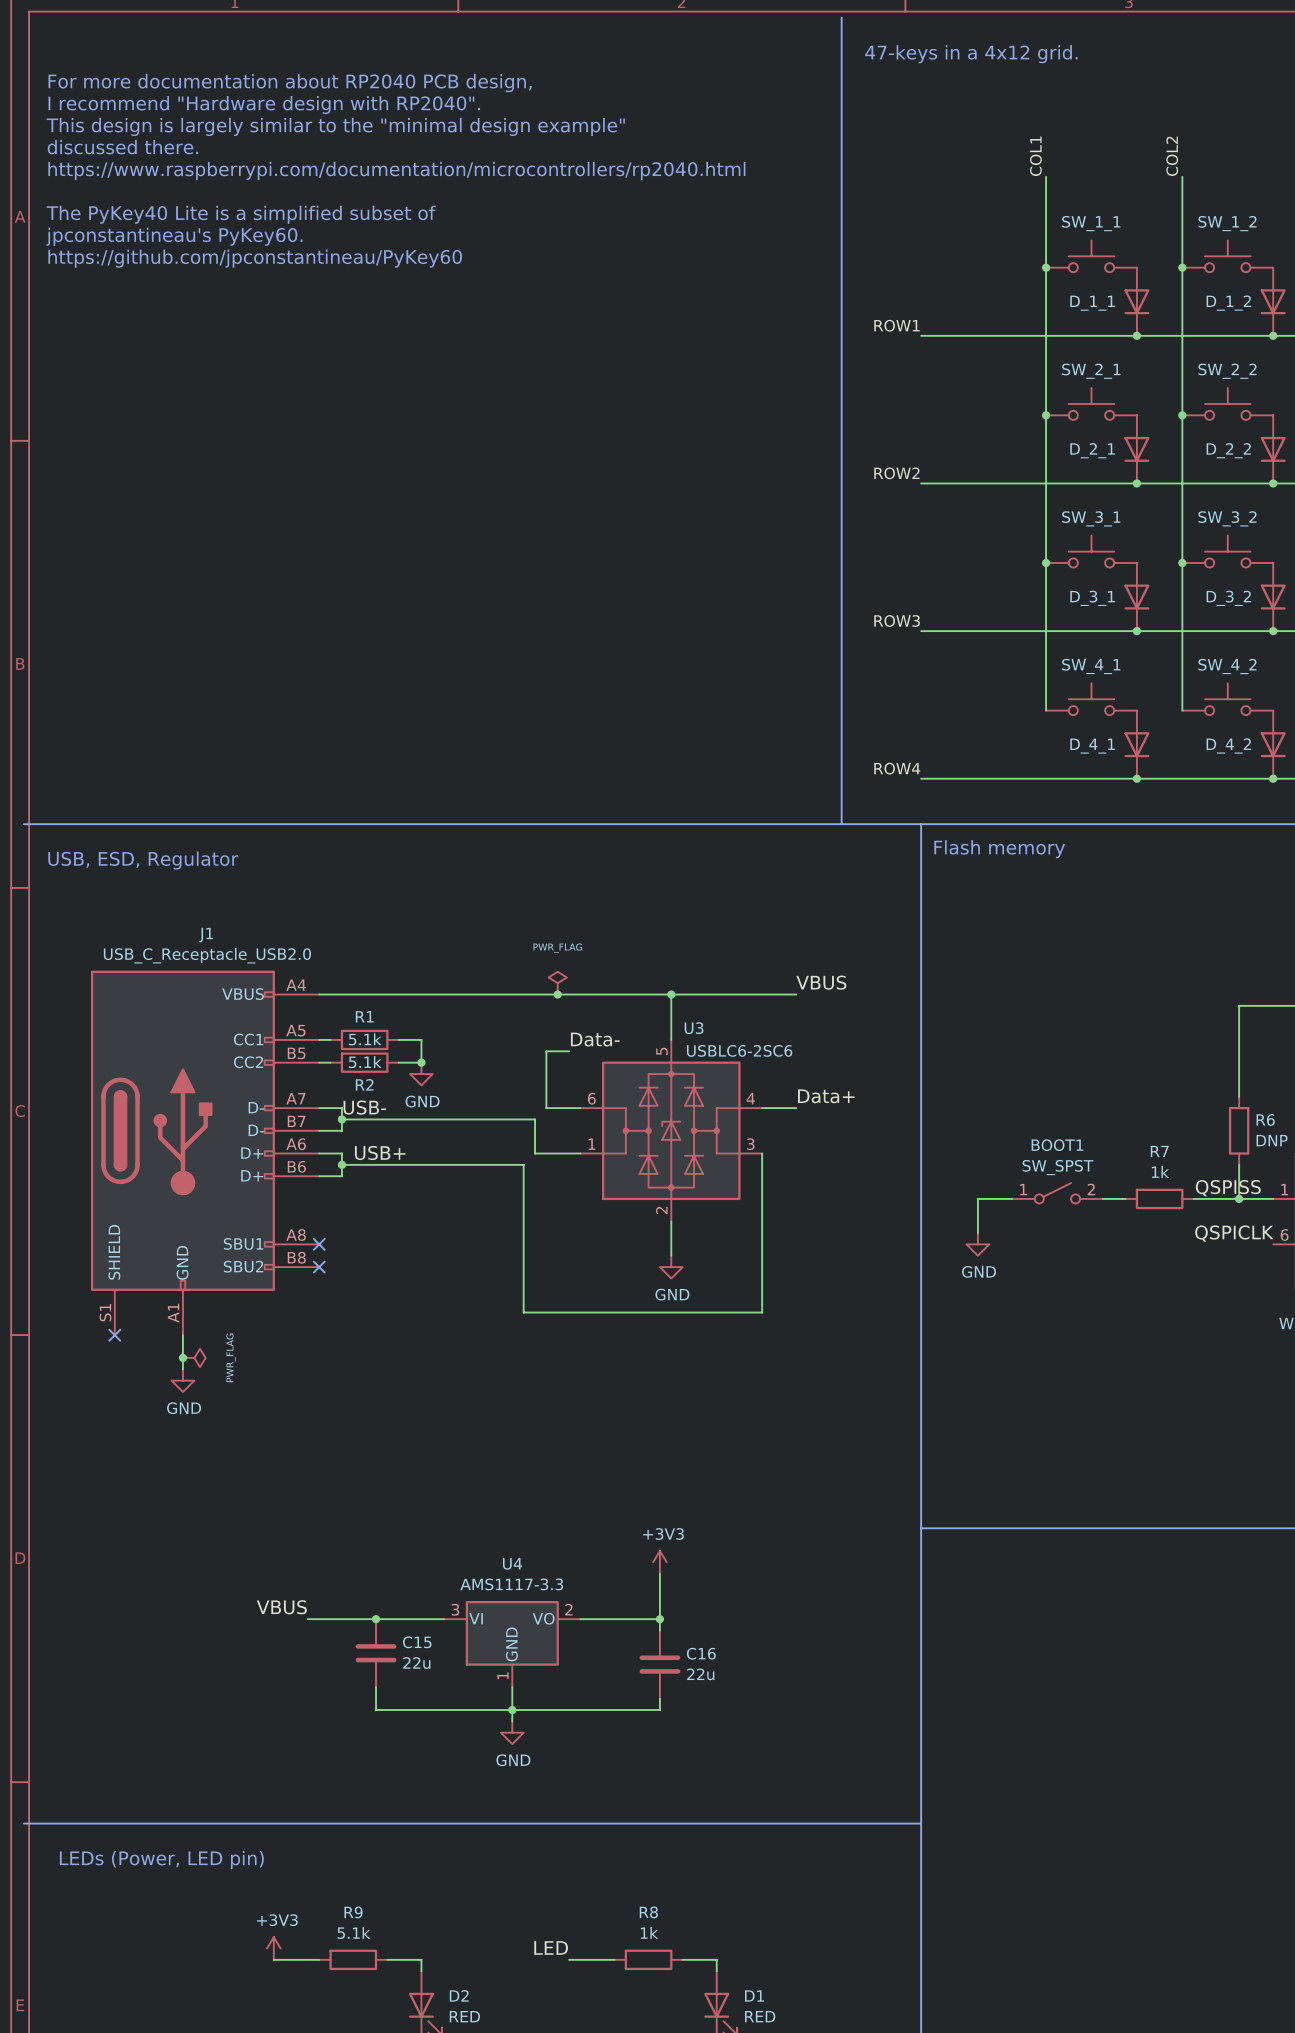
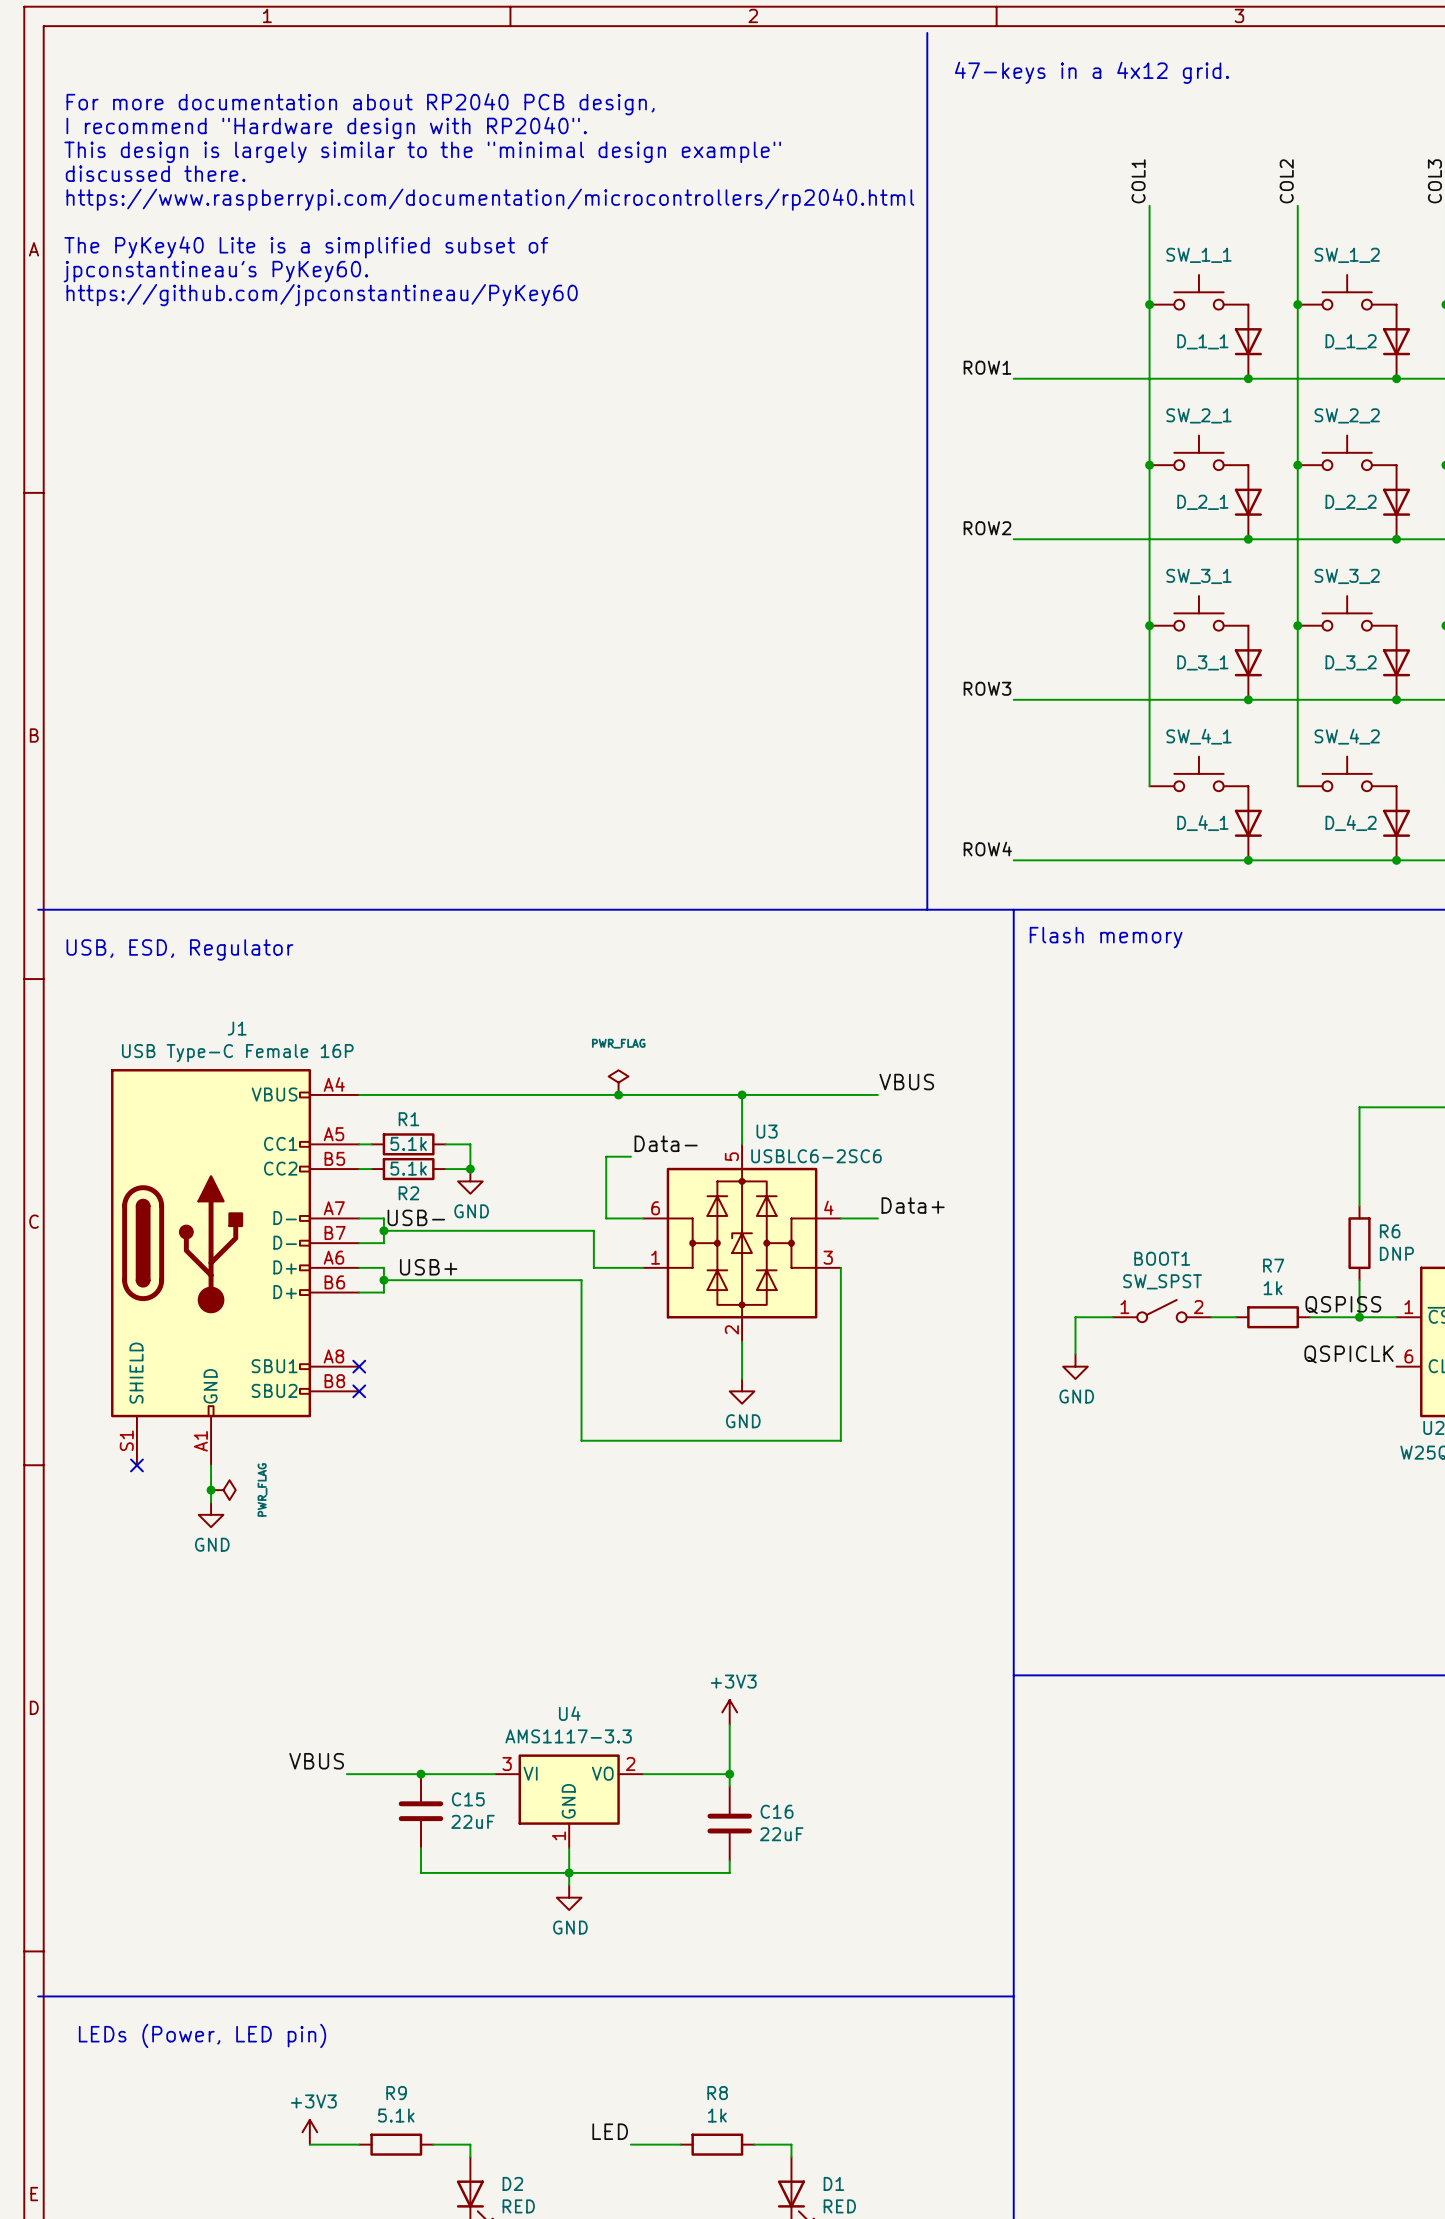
J1 value: USB_C_Receptacle_USB2.0 (207, 955) -> USB Type-C Female 16P (237, 1053)
C15 value: 22u (416, 1663) -> 22uF (473, 1821)
C16 value: 22u (700, 1674) -> 22uF (781, 1834)

